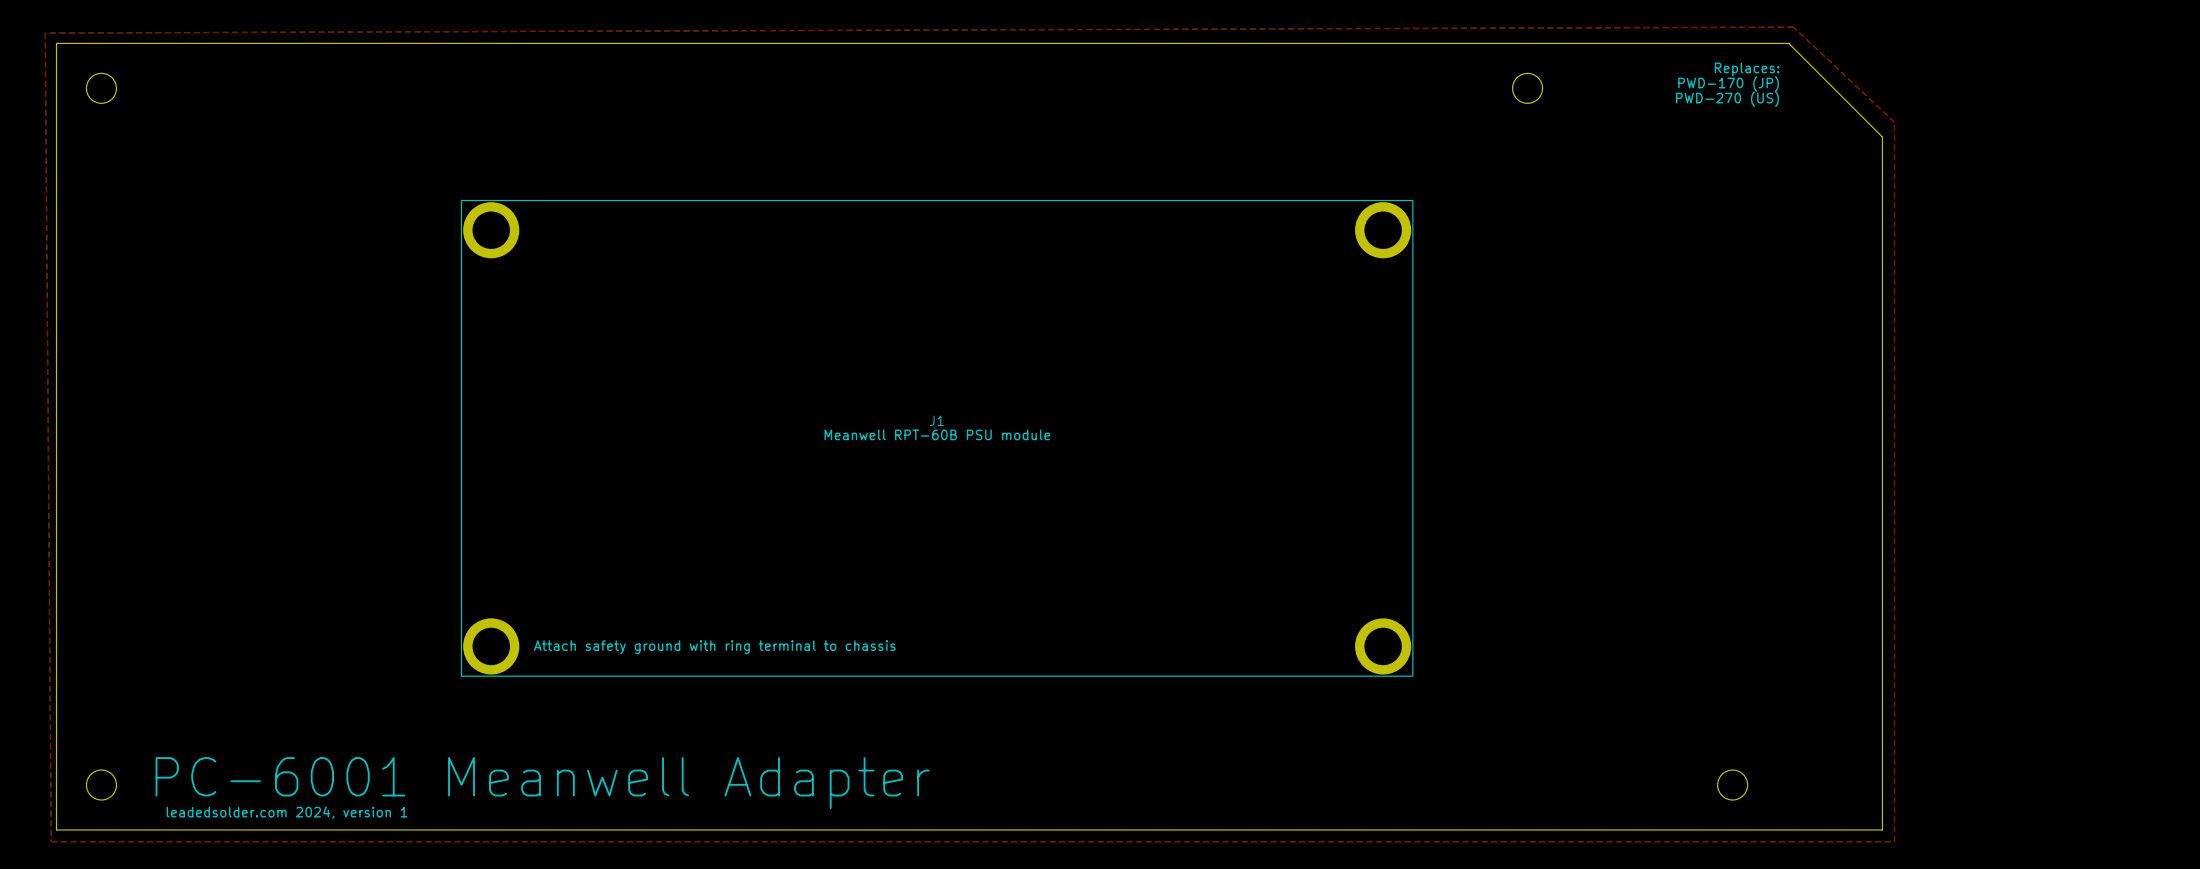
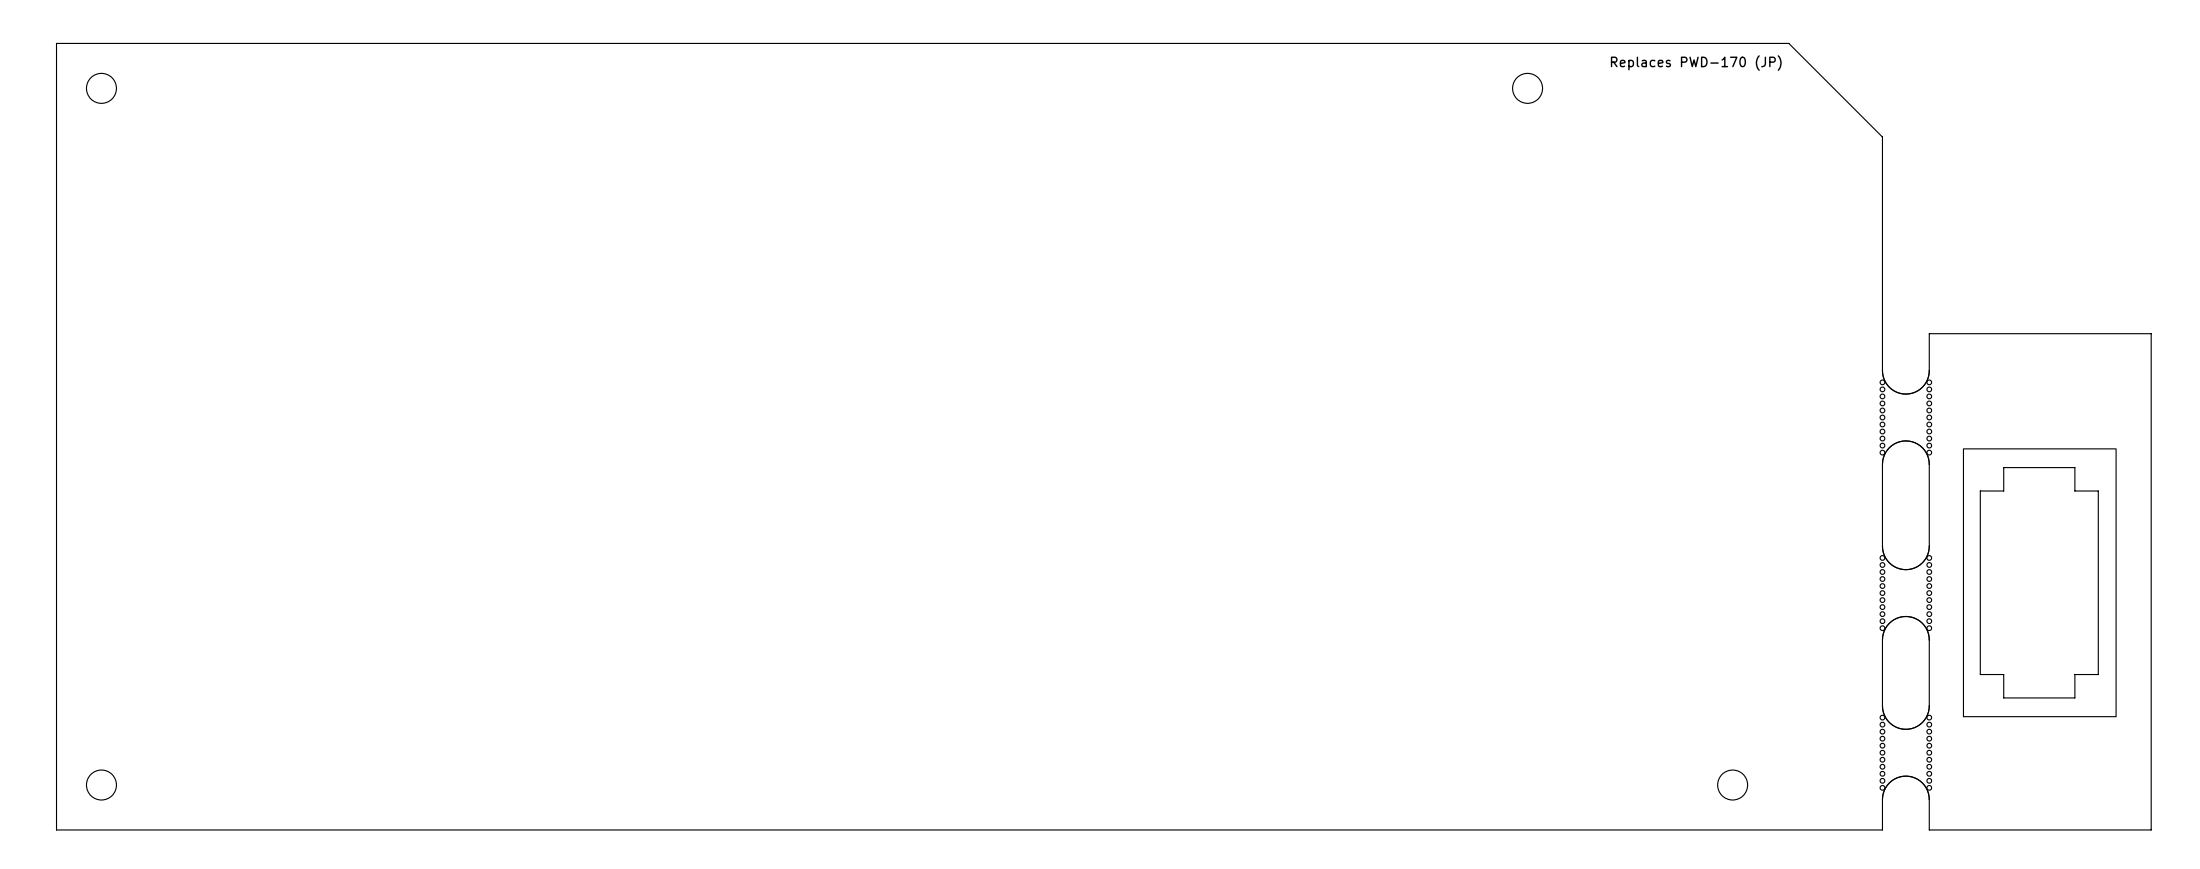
top zone outline: (1793, 27) (1894, 122) (1894, 841) (51, 841) (45, 33) (1793, 27) -> none
text: none -> Replaces PWD-170 (JP) (1696, 63)
text: Replaces: (1747, 69) -> none
text: PWD-170 (JP) (1728, 84) -> none
text: PWD-270 (US) (1727, 99) -> none
board edge: (1882, 370) (1882, 464) -> none
board edge: none -> (1929, 370) (1929, 333) (2151, 333) (2151, 829) (1929, 829) (1929, 799)
part: none -> (1905, 417)
J1: Meanwell RPT-60B PSU module (937, 438) -> none
drawing: none -> [1962, 448, 2117, 718]
board edge: none -> (1929, 464) (1929, 546)
board edge: (1882, 546) (1882, 639) -> none
part: none -> (1905, 593)
board edge: none -> (1929, 639) (1929, 705)
text: Attach safety ground with ring terminal to chassis (714, 647) -> none
board edge: (1882, 705) (1882, 799) -> none
part: none -> (1905, 752)
text: PC-6001 Meanwell Adapter (542, 783) -> none
text: leadedsolder.com 2024, version 1 (287, 812) -> none

